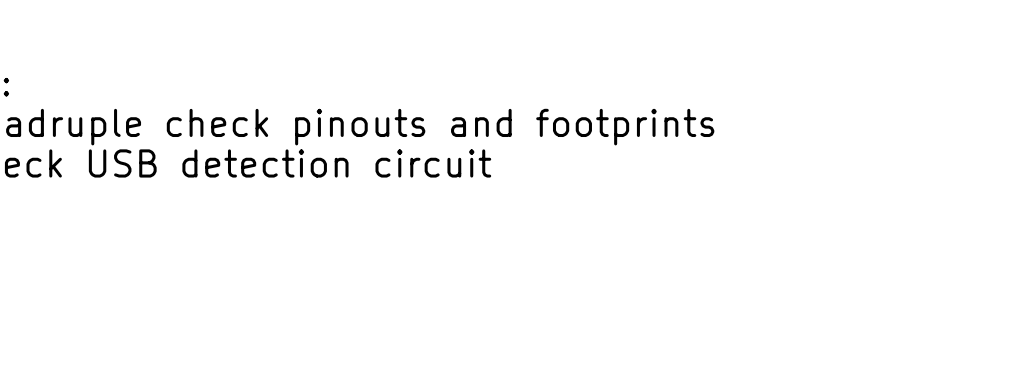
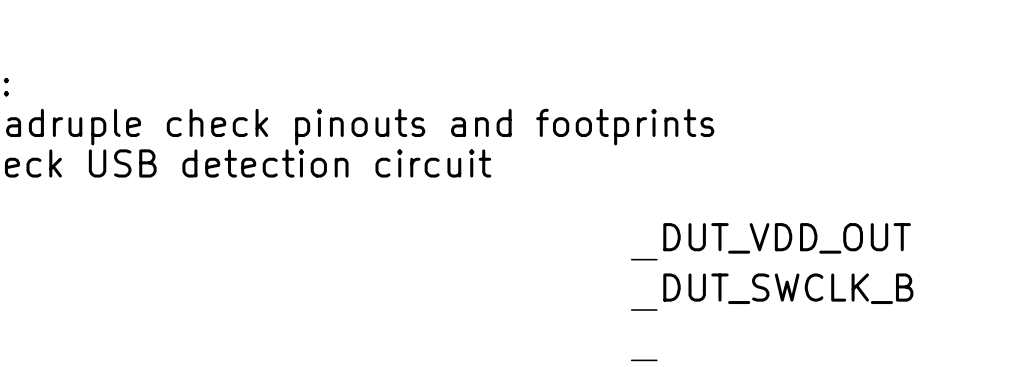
label: none -> DUT_VDD_OUT (787, 238)
wire: none -> (631, 259) (656, 259)
label: none -> DUT_SWCLK_B (788, 288)
wire: none -> (631, 310) (656, 310)
wire: none -> (631, 360) (656, 360)

